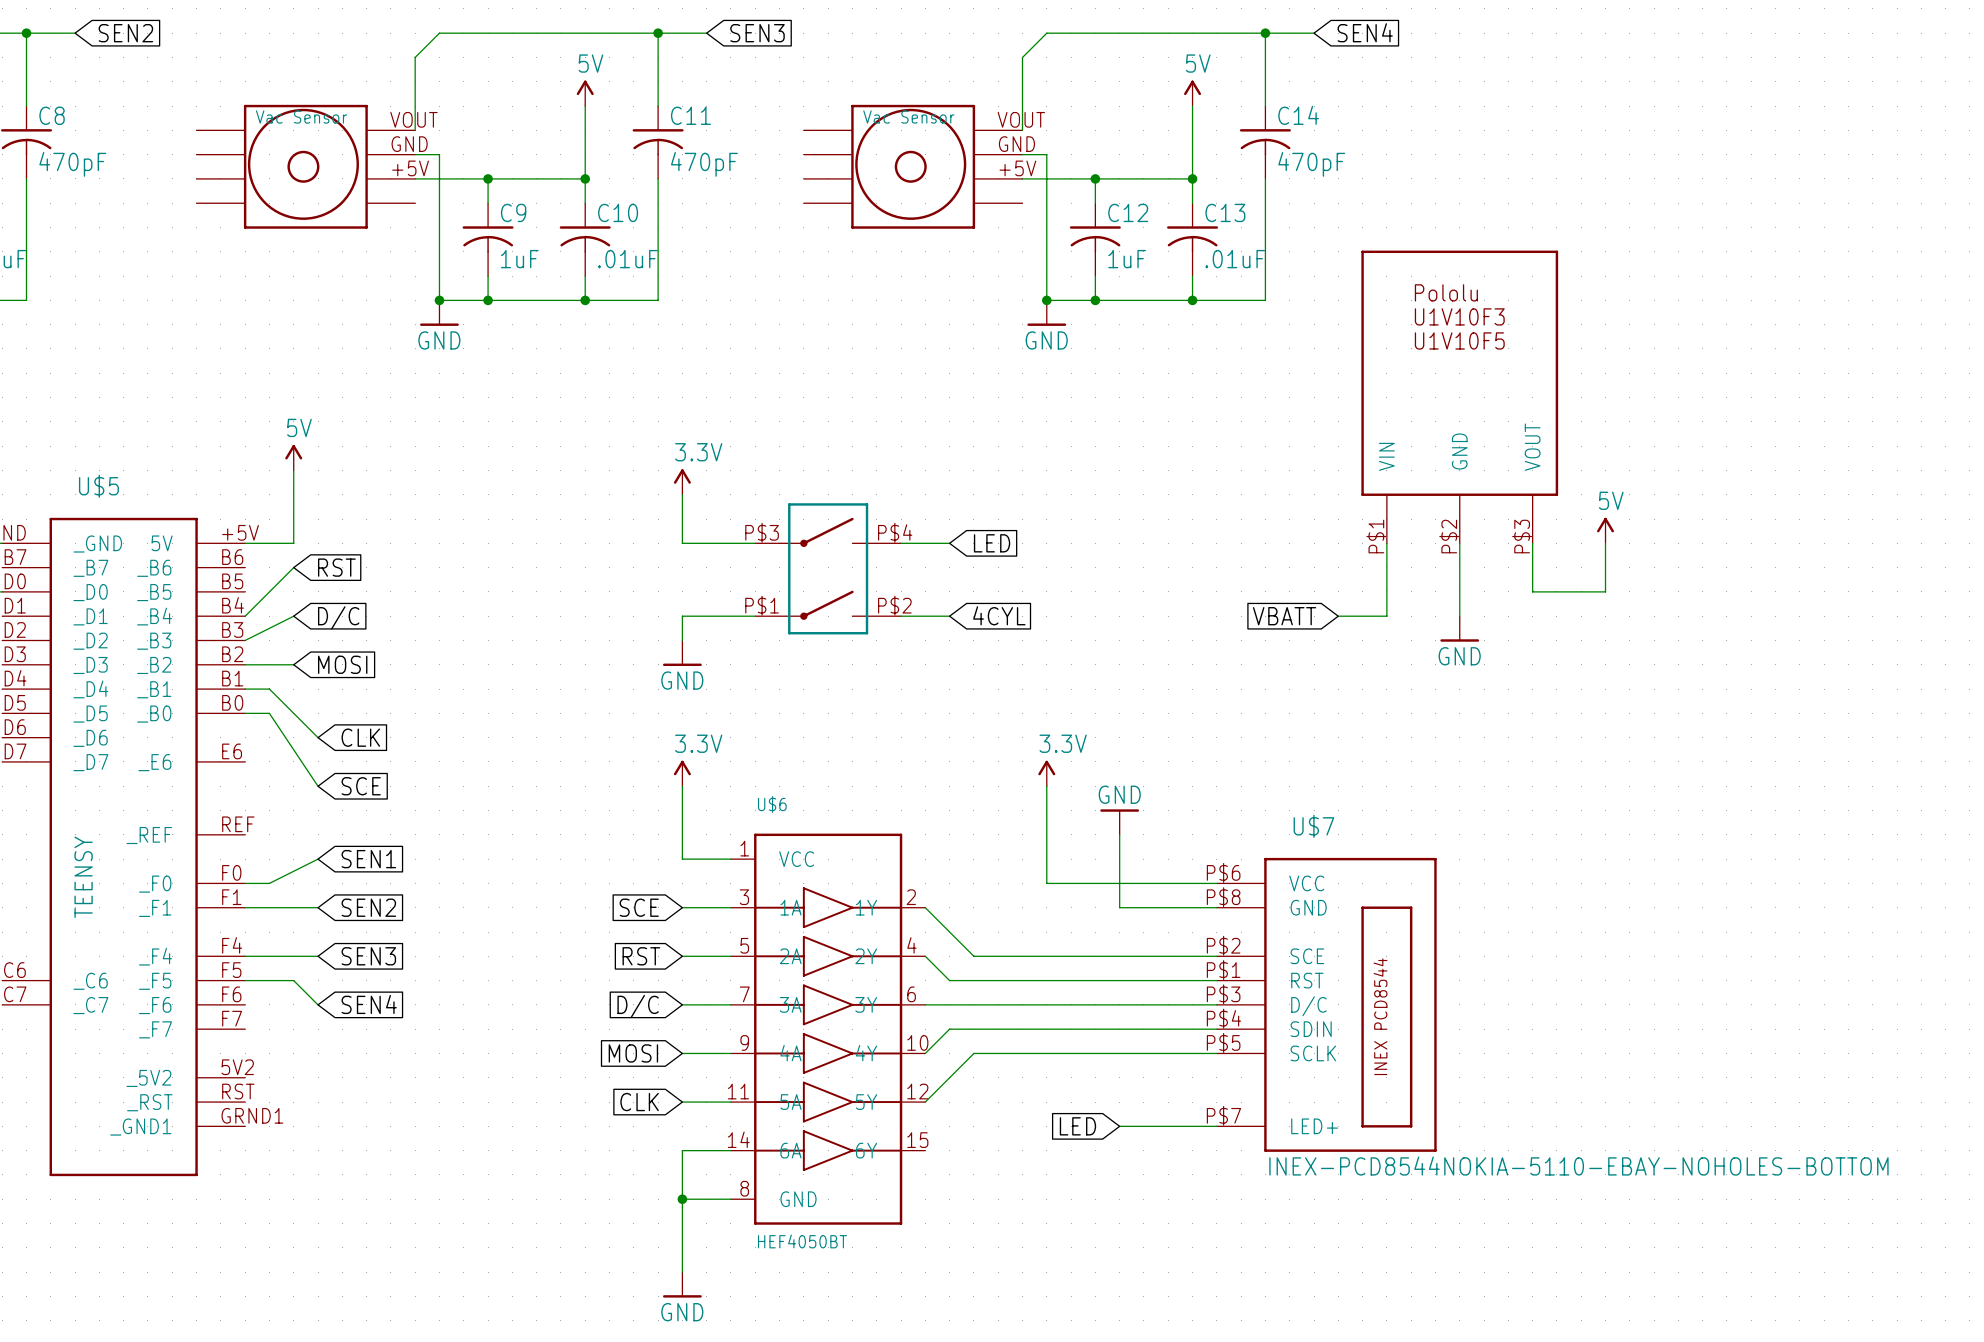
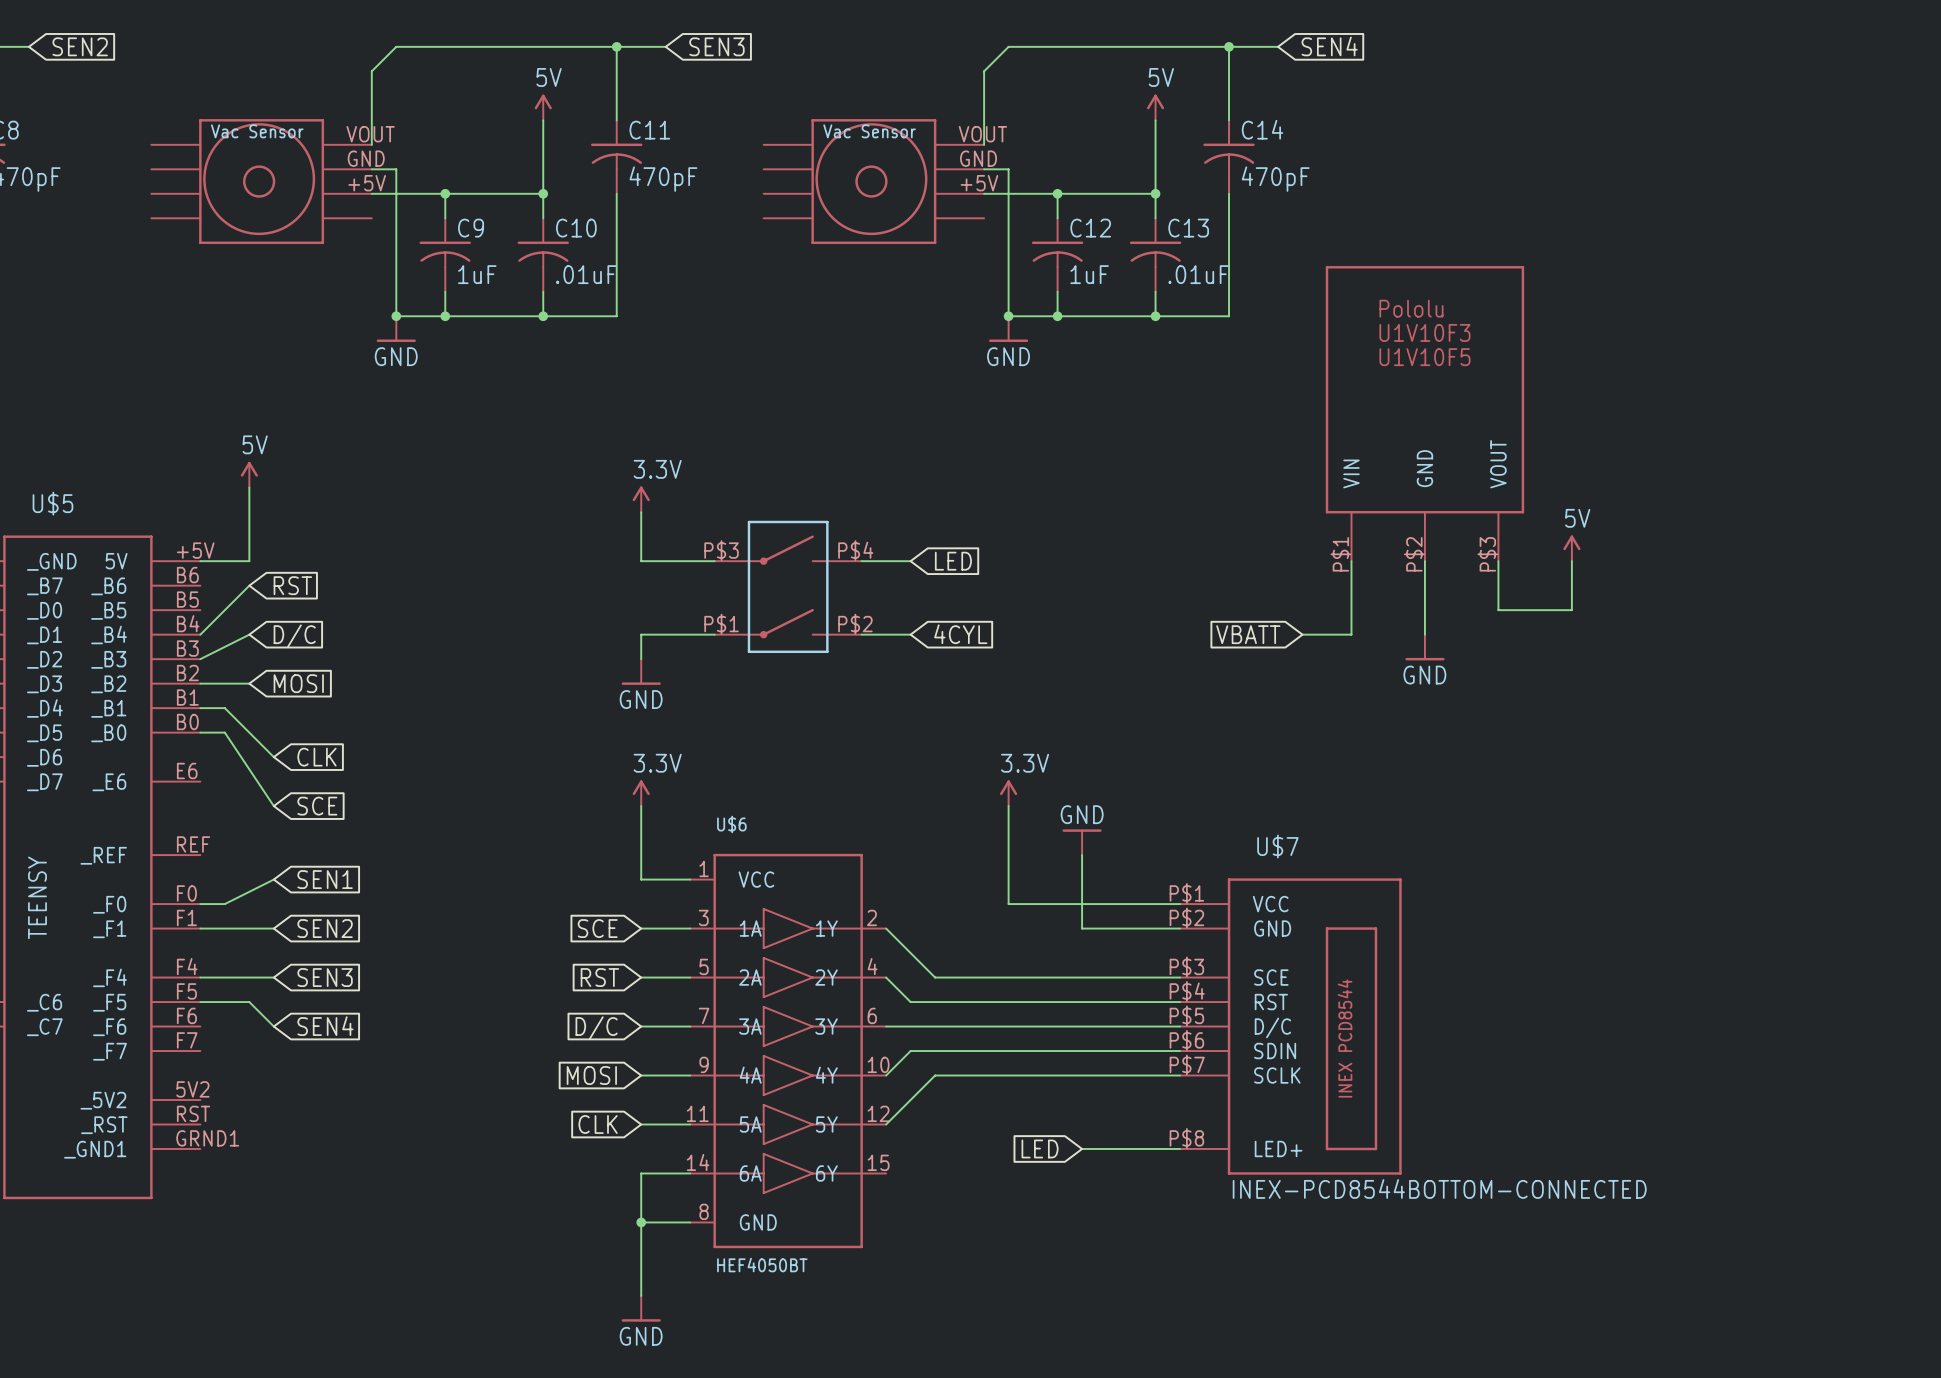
U$7 pin number: P$6 (1223, 872) -> P$1 (1186, 893)
U$7 pin number: P$8 (1223, 897) -> P$2 (1186, 917)
U$7 pin number: P$2 (1223, 945) -> P$3 (1186, 966)
U$7 pin number: P$1 (1223, 970) -> P$4 (1187, 991)
U$7 pin number: P$3 (1223, 994) -> P$5 (1186, 1015)
U$7 pin number: P$4 (1223, 1018) -> P$6 (1186, 1040)
U$7 pin number: P$5 (1223, 1042) -> P$7 (1187, 1064)
U$7 pin number: P$7 (1223, 1115) -> P$8 (1186, 1138)
U$7 value: INEX-PCD8544NOKIA-5110-EBAY-NOHOLES-BOTTOM (1578, 1166) -> INEX-PCD8544BOTTOM-CONNECTED (1439, 1188)

